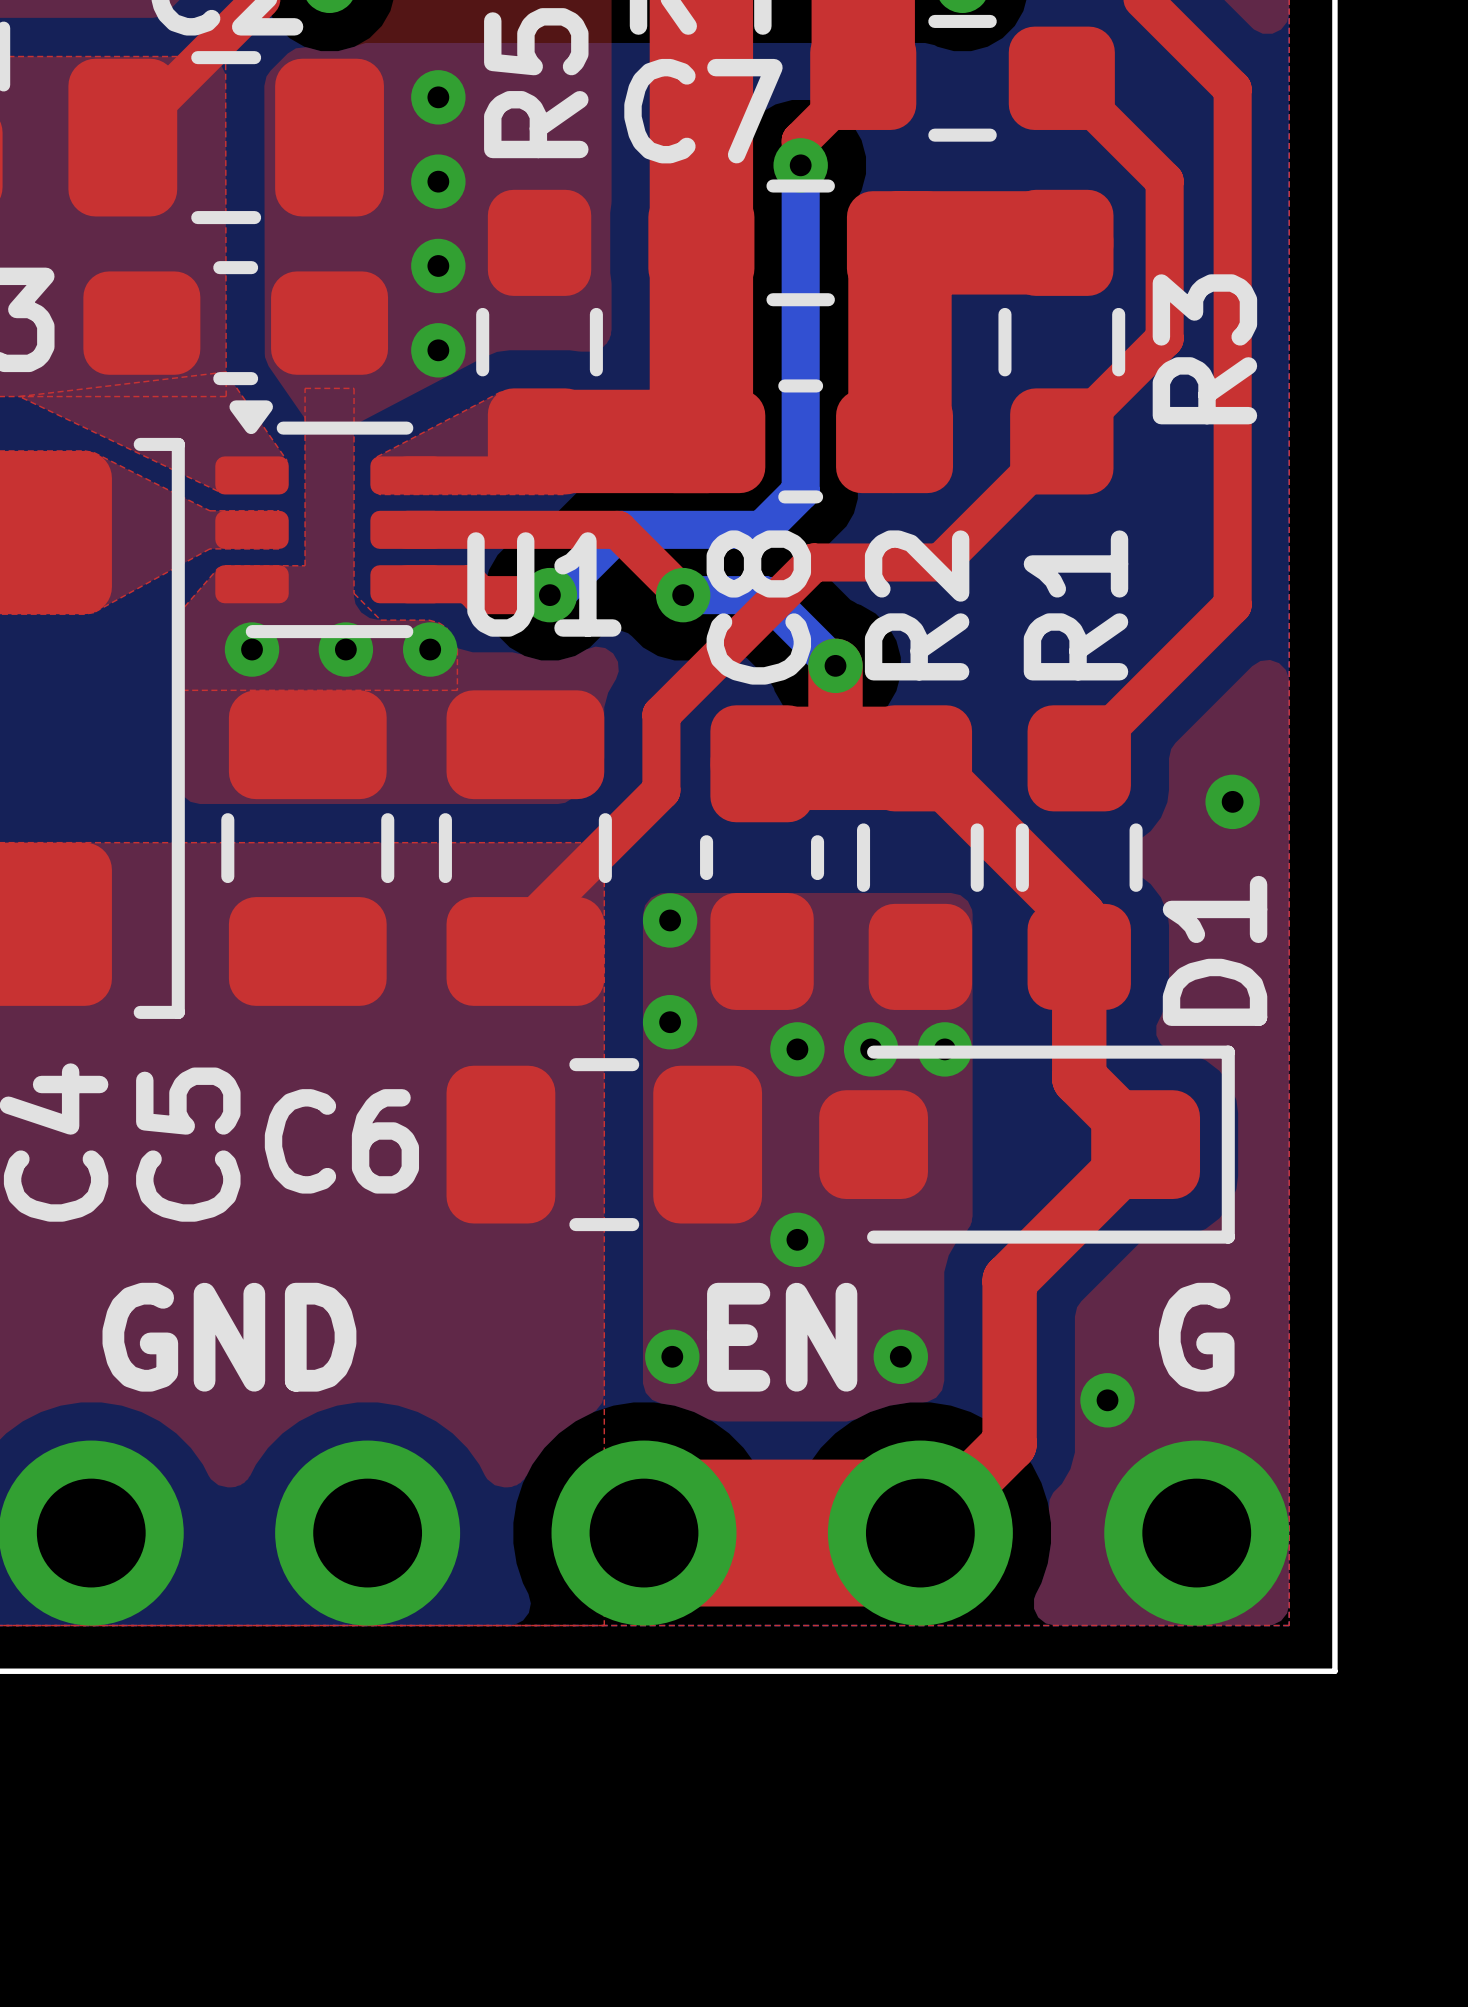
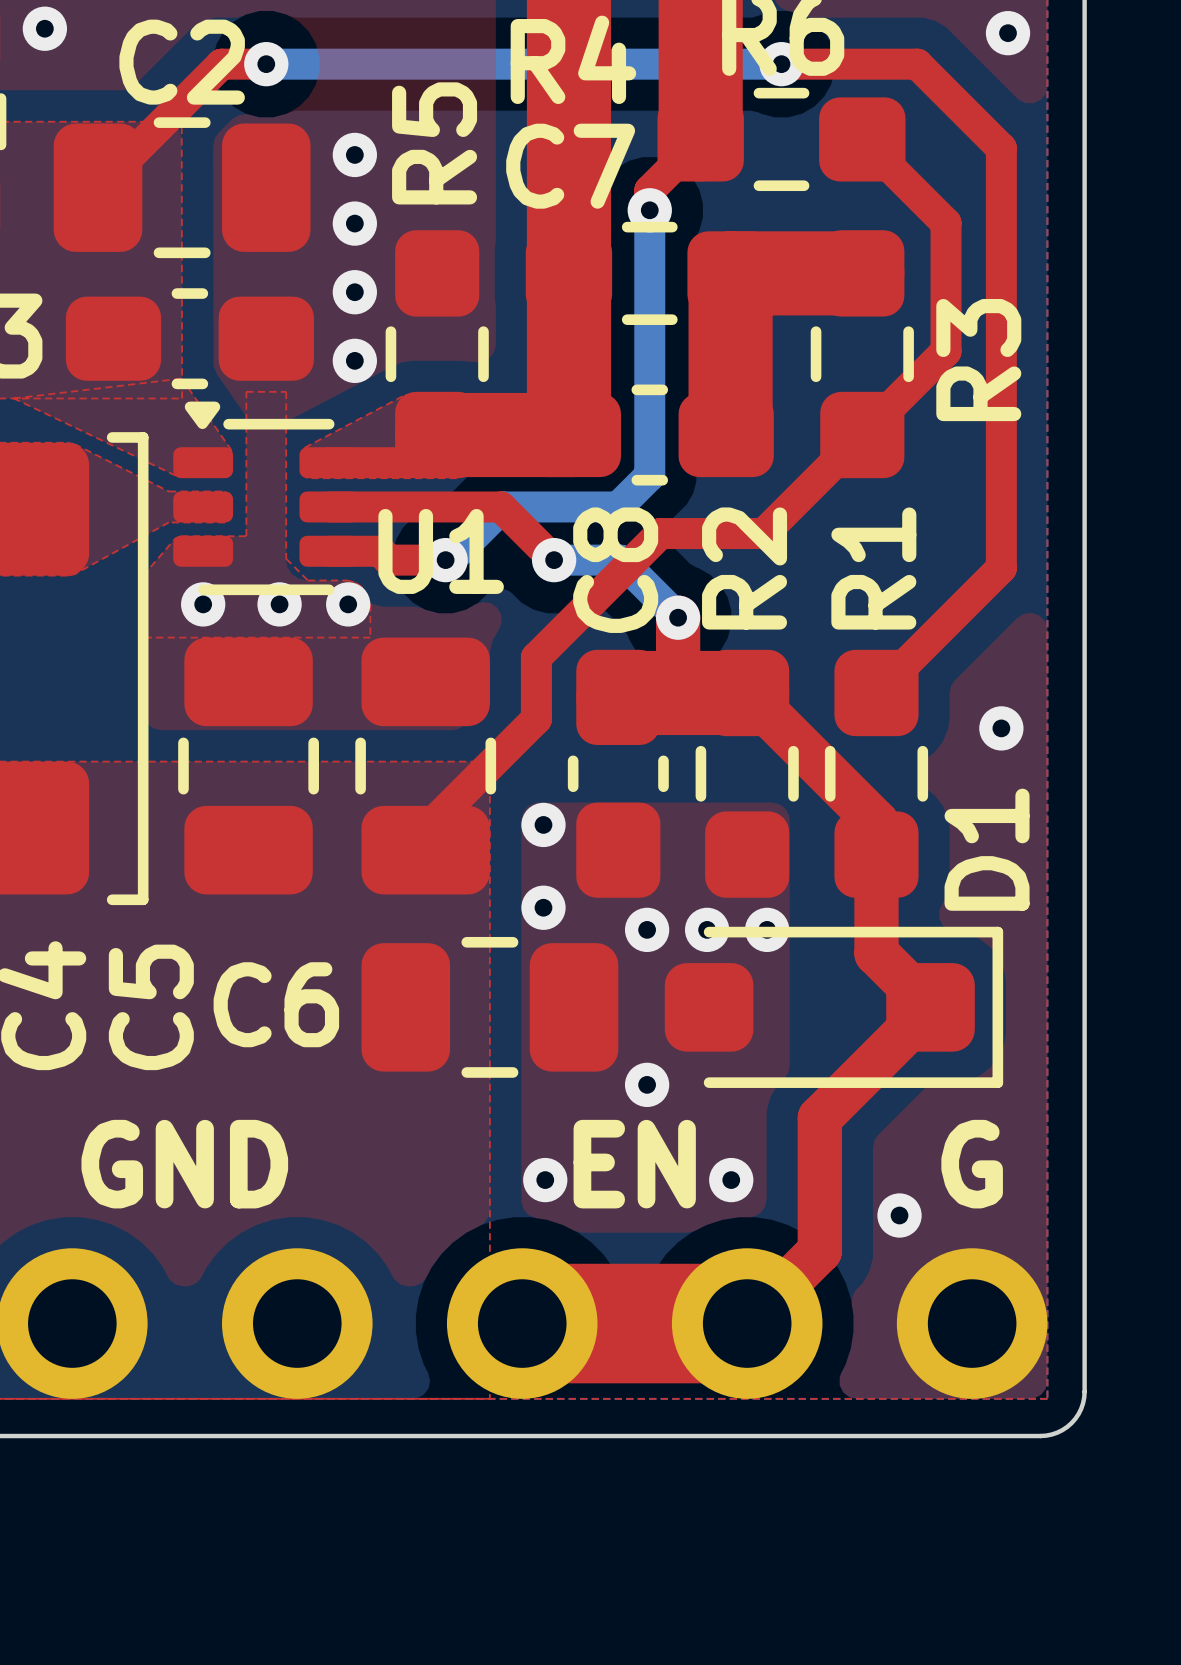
board edge: (1334, 1616) (1334, 1671) (1280, 1671) -> (1084, 1391) (1081, 1408) (1071, 1423) (1057, 1432) (1040, 1436)

